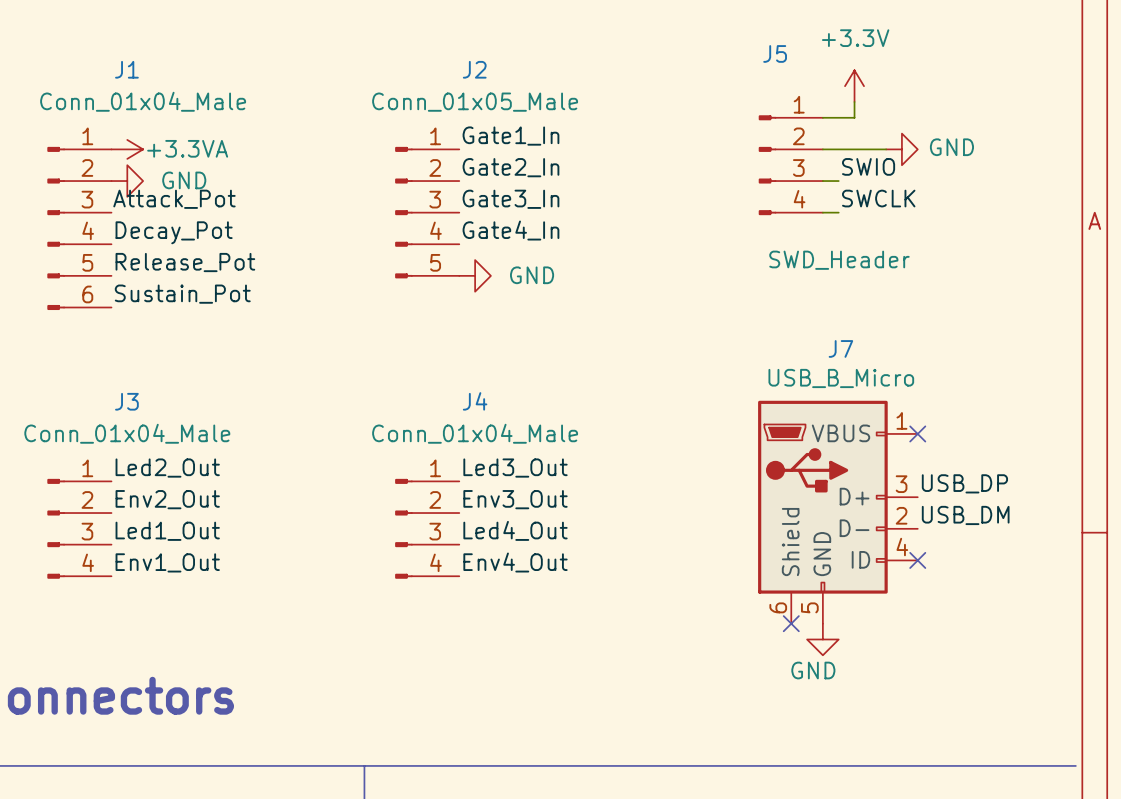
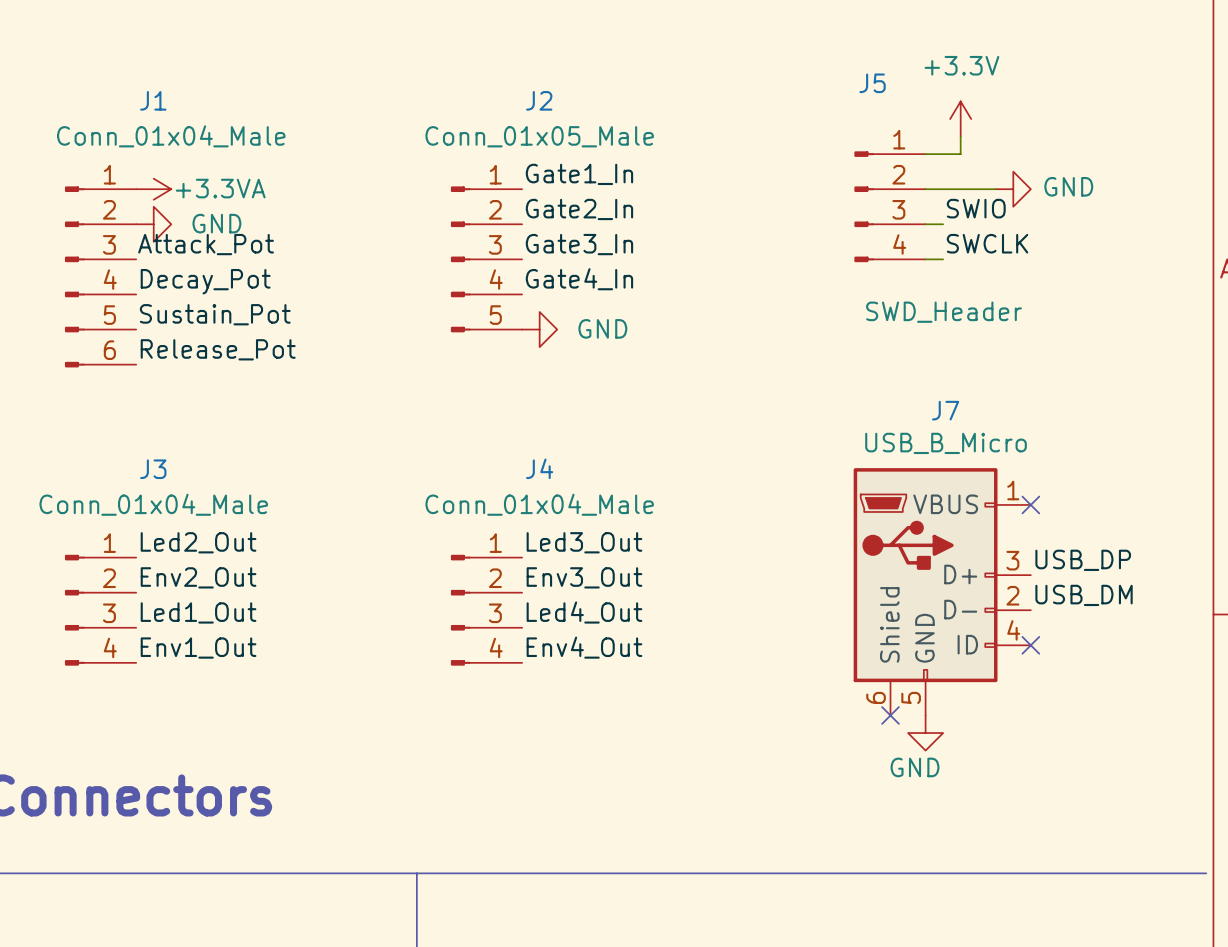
label: Release_Pot (185, 262) -> Sustain_Pot (215, 314)
label: Sustain_Pot (182, 294) -> Release_Pot (218, 349)

